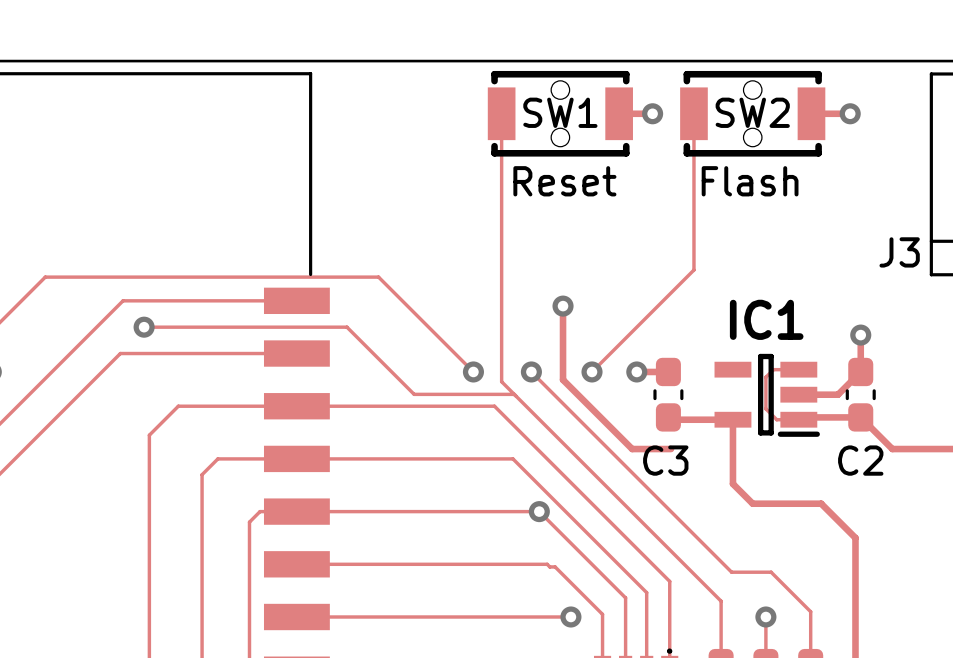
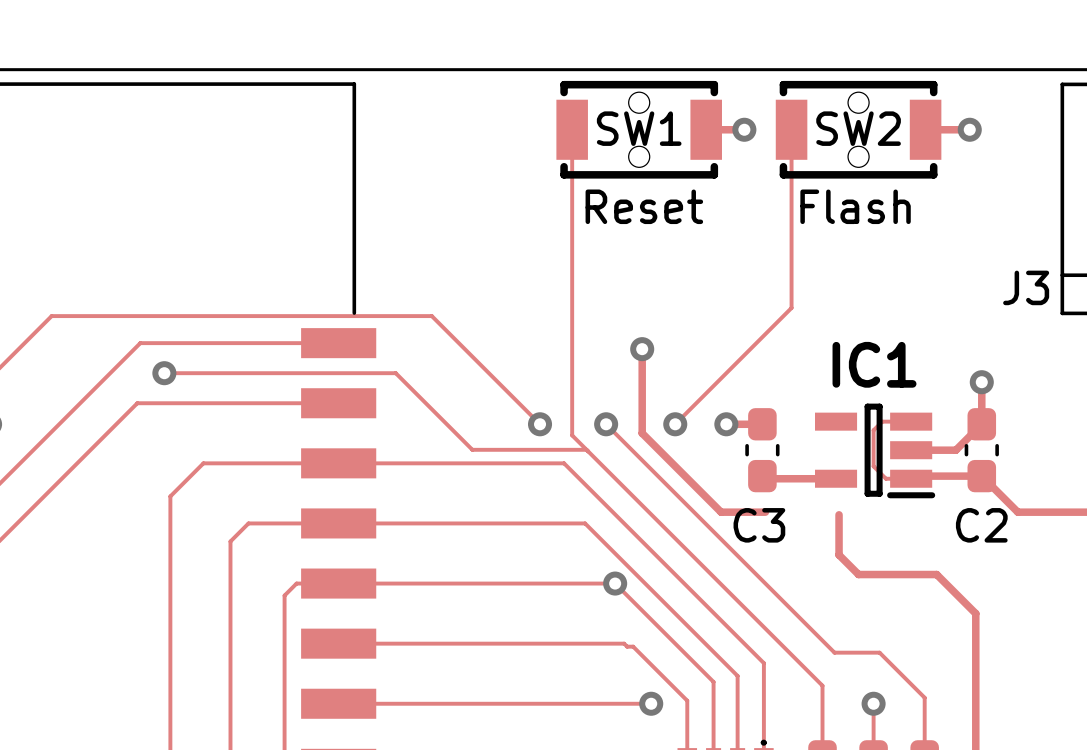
track: (732, 419) (732, 483) (735, 486) -> (839, 514) (839, 555)

